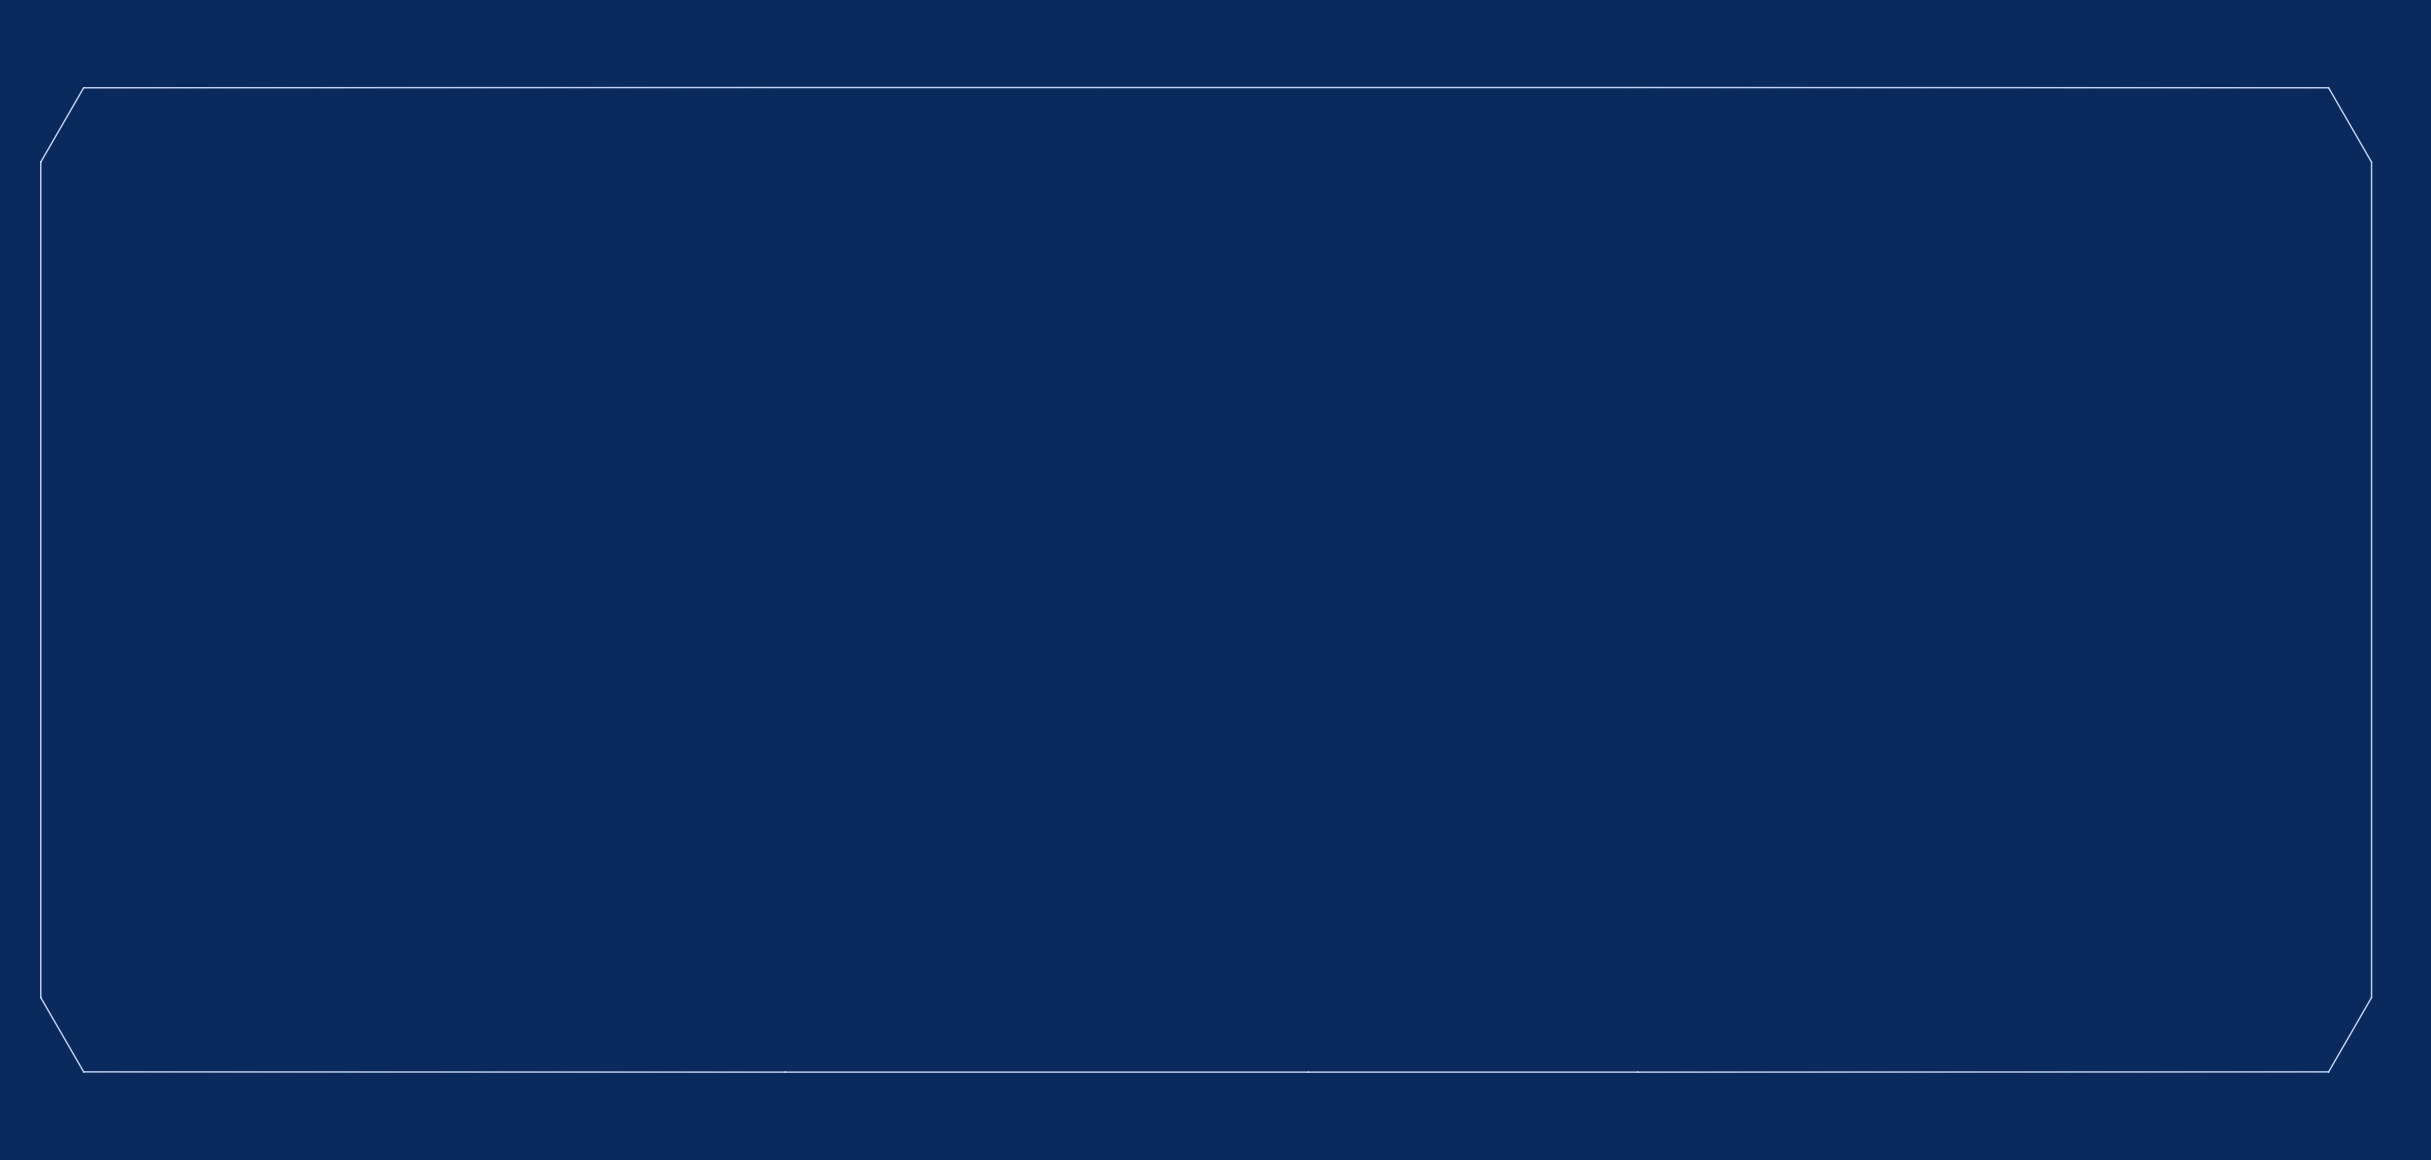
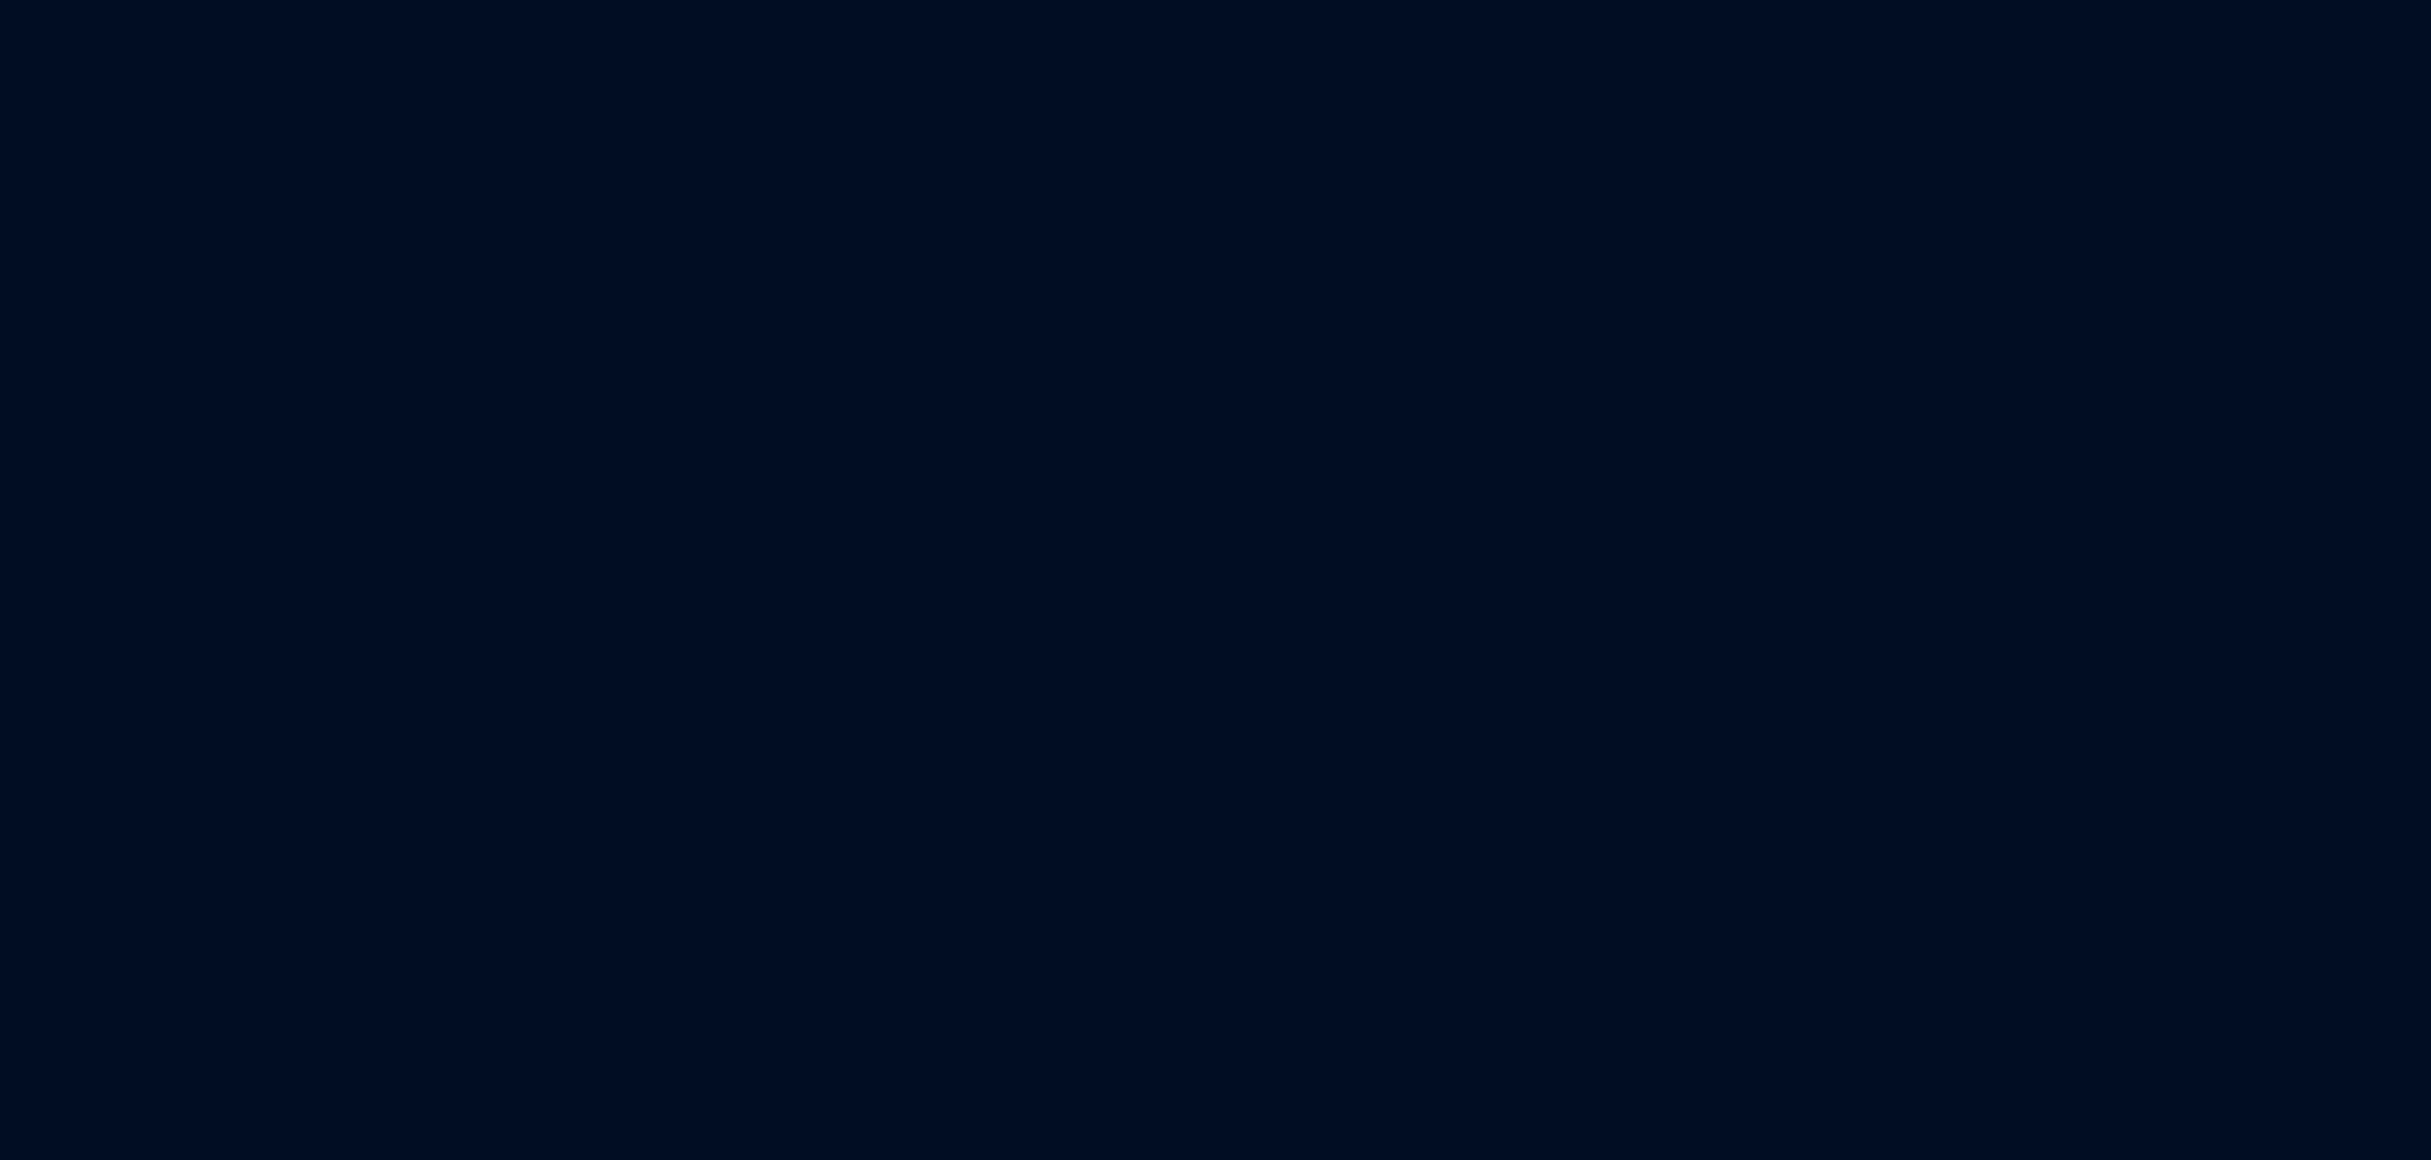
board edge: (1626, 87) (2328, 87) (2371, 162) (2371, 997) (2328, 1071) (83, 1071) (40, 997) (40, 162) (83, 87) (1626, 87) -> none

